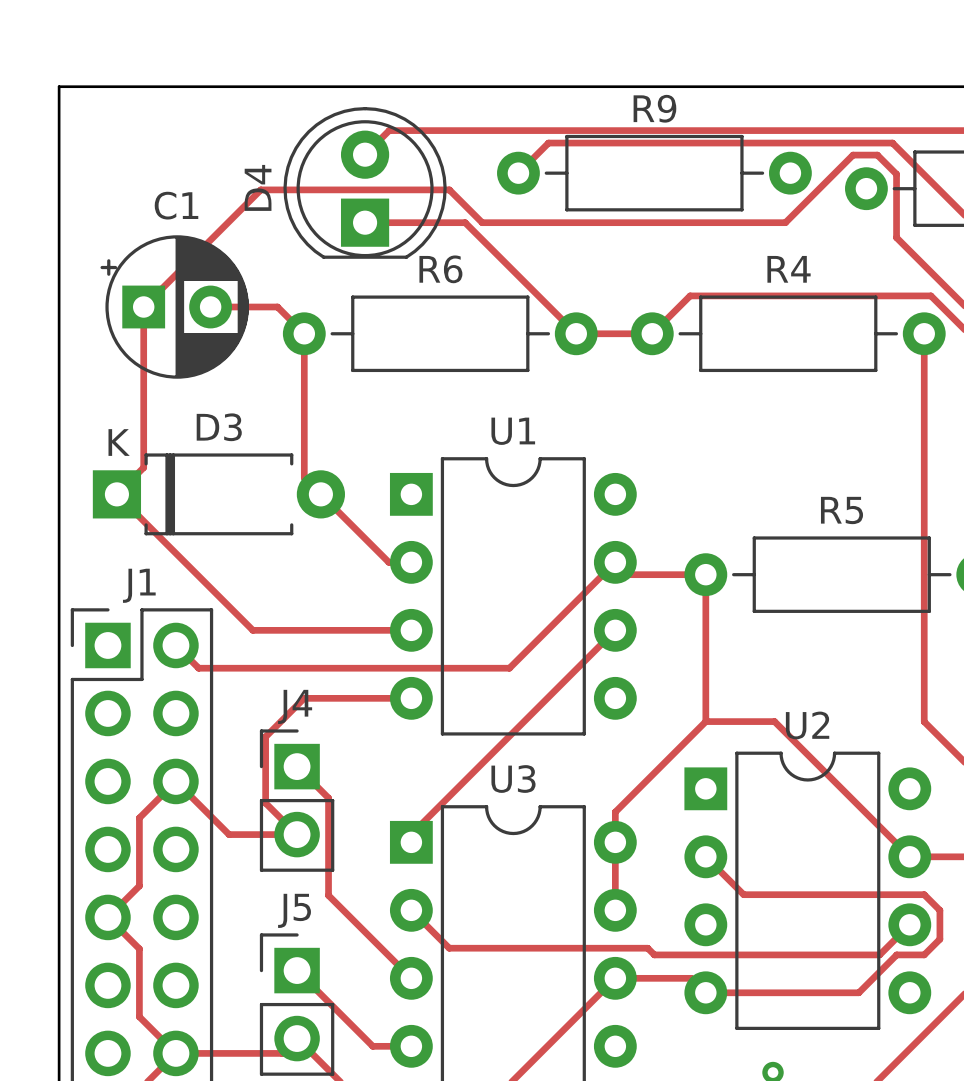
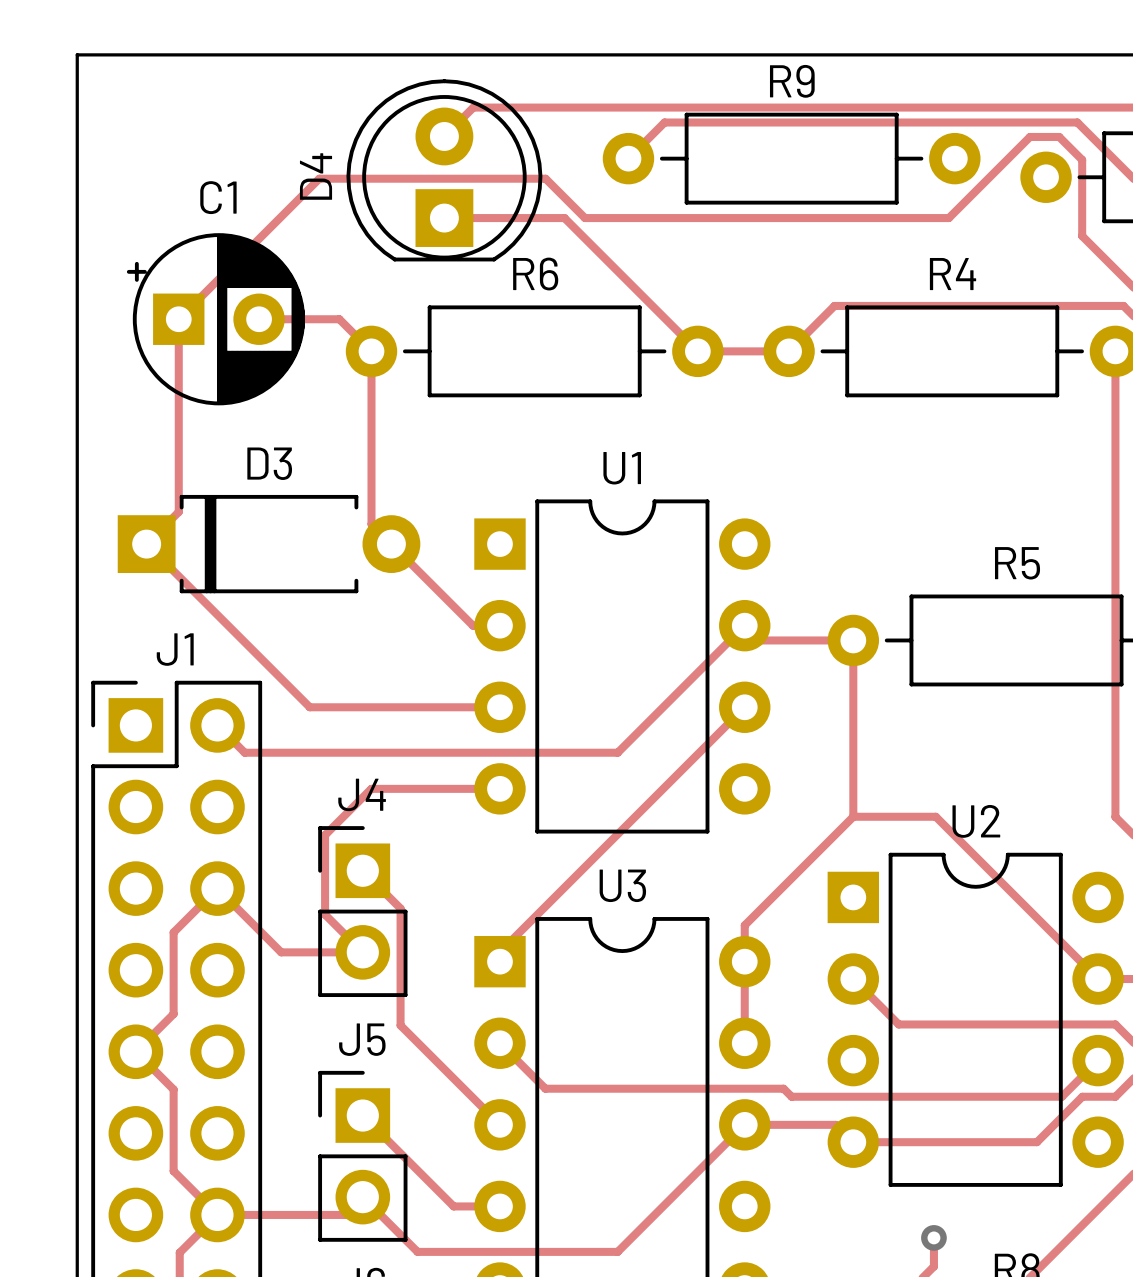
D3 text: K (119, 442) -> none

